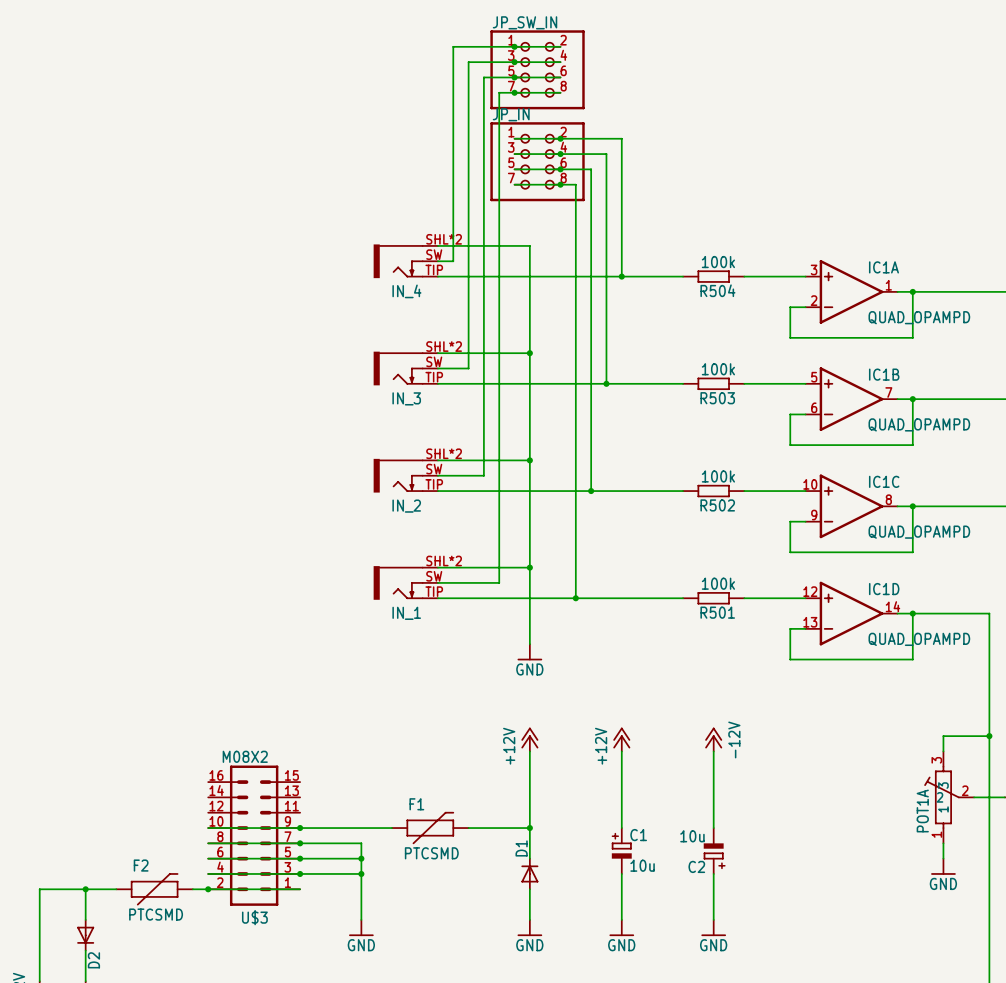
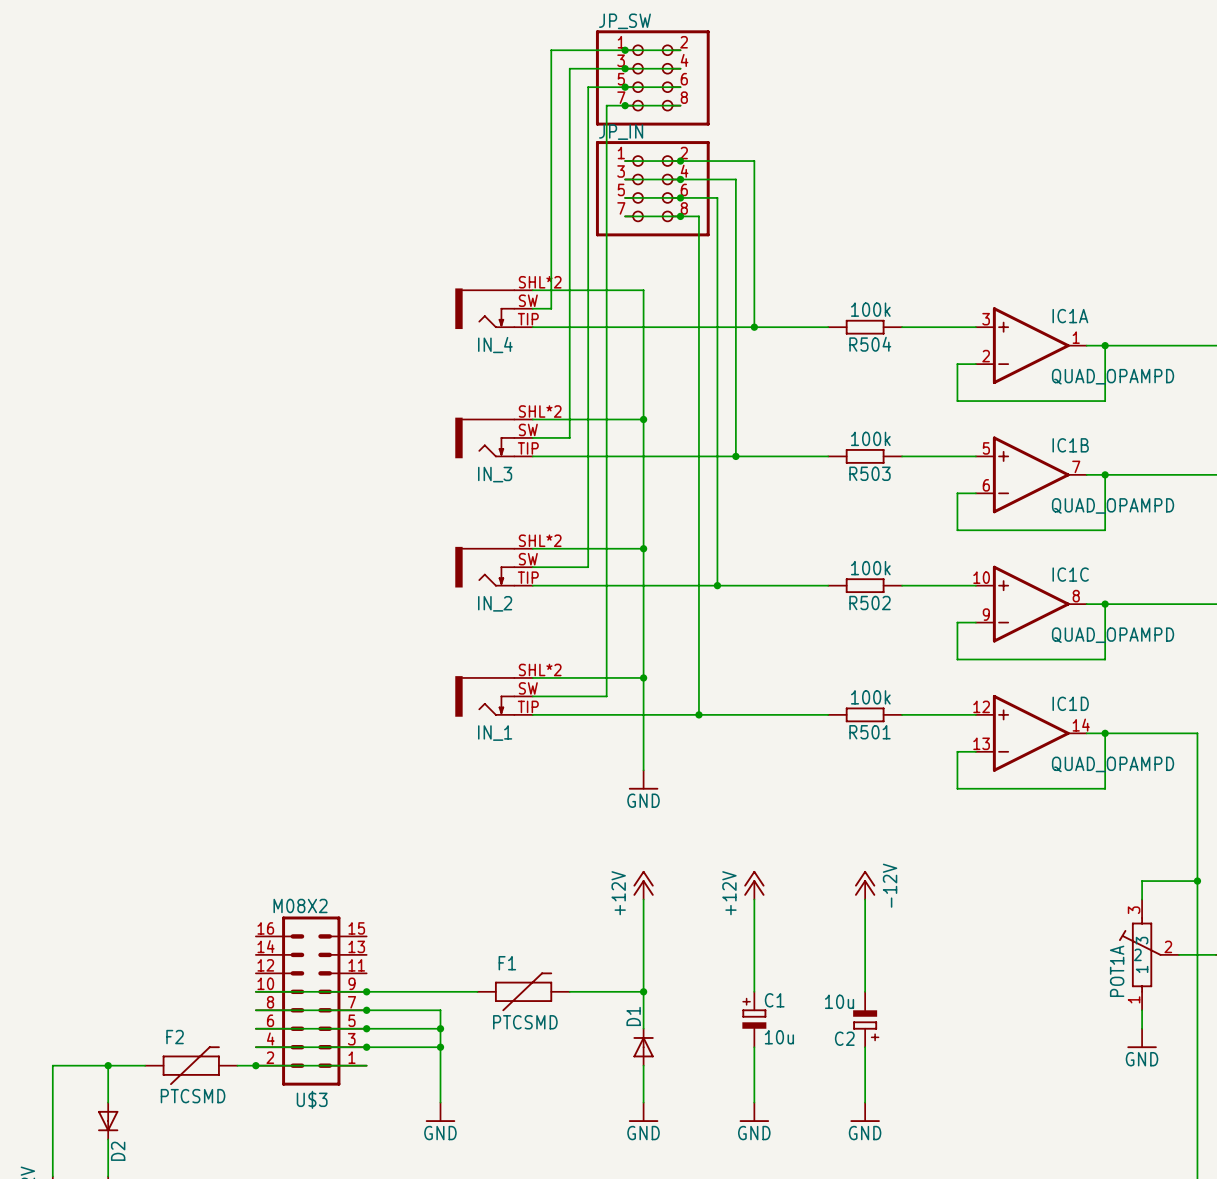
JP_SW_IN name: JP_SW_IN (525, 22) -> JP_SW (624, 21)

